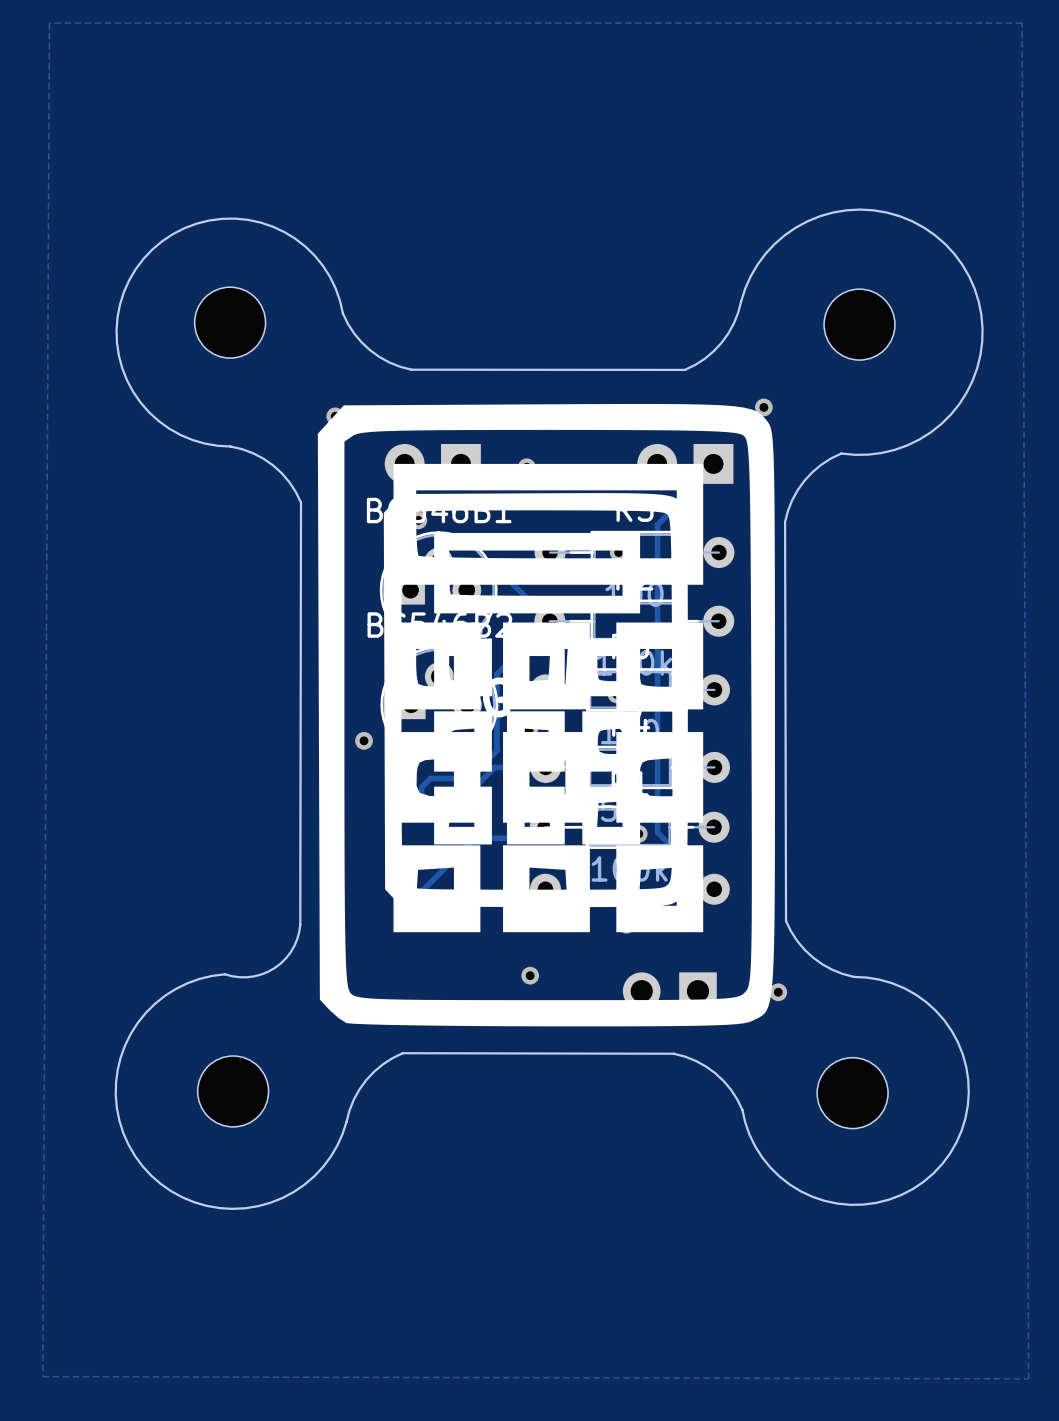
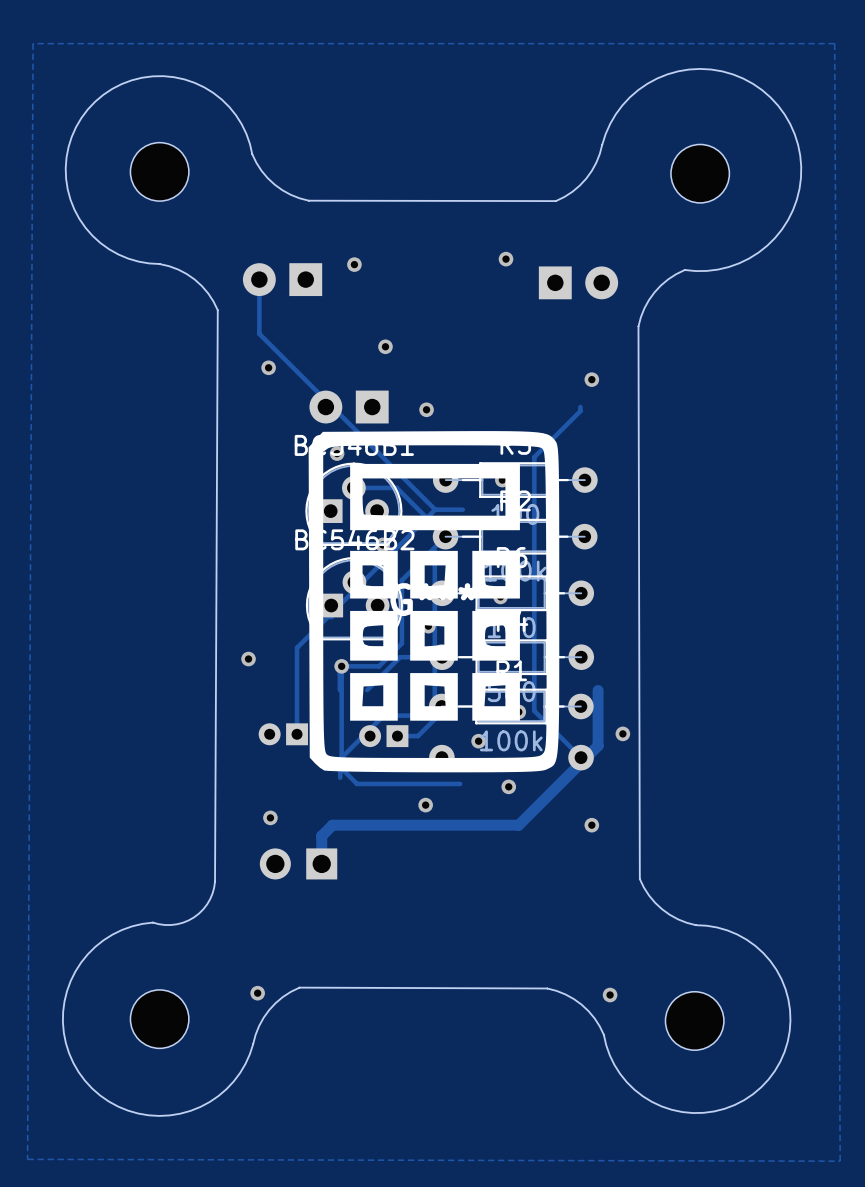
via: none -> (506, 259)
via: none -> (354, 264)
board edge: (741, 301) (733, 323) (721, 342) (704, 358) (684, 369) (411, 369) (389, 362) (361, 342) (347, 323) (335, 288) (323, 266) (305, 246) (272, 226) (235, 218) (196, 223) (162, 241) (135, 269) (119, 304) (117, 343) (122, 368) (140, 402) (158, 421) (180, 434) (204, 443) (241, 449) (263, 458) (281, 473) (301, 502) (299, 931) (294, 945) (286, 958) (268, 971) (246, 977) (224, 974) (212, 975) (187, 983) (165, 995) (145, 1012) (125, 1045) (116, 1082) (119, 1120) (134, 1155) (151, 1175) (171, 1191) (194, 1202) (232, 1208) (258, 1206) (293, 1191) (314, 1176) (330, 1156) (342, 1133) (353, 1099) (366, 1080) (382, 1064) (402, 1053) (673, 1053) (685, 1056) (715, 1073) (731, 1089) (742, 1109) (755, 1146) (779, 1176) (812, 1196) (837, 1203) (876, 1202) (901, 1195) (923, 1182) (949, 1153) (965, 1118) (968, 1079) (957, 1042) (944, 1020) (926, 1002) (904, 988) (879, 979) (842, 974) (822, 964) (797, 940) (786, 921) (785, 522) (797, 490) (821, 464) (841, 453) (881, 453) (907, 445) (930, 432) (950, 414) (972, 380) (980, 354) (982, 328) (978, 301) (962, 264) (935, 235) (899, 216) (859, 209) (820, 216) (784, 235) (757, 264) (741, 301) -> (602, 144) (596, 162) (586, 178) (572, 191) (555, 201) (308, 200) (290, 194) (267, 178) (252, 154) (241, 124) (229, 106) (213, 92) (184, 79) (152, 76) (121, 84) (95, 101) (76, 127) (68, 147) (66, 178) (74, 209) (85, 227) (100, 243) (118, 254) (138, 261) (169, 266) (186, 274) (201, 286) (217, 310) (215, 881) (212, 893) (207, 904) (194, 917) (183, 922) (171, 925) (152, 922) (142, 923) (112, 934) (87, 954) (70, 980) (63, 1011) (63, 1032) (69, 1053) (84, 1080) (100, 1095) (118, 1106) (138, 1113) (169, 1115) (190, 1110) (209, 1102) (226, 1089) (240, 1072) (249, 1054) (259, 1026) (269, 1010) (282, 996) (299, 987) (547, 988) (556, 990) (581, 1004) (594, 1018) (603, 1034) (614, 1064) (634, 1089) (652, 1101) (682, 1112) (714, 1111) (734, 1105) (761, 1087) (780, 1061) (789, 1031) (790, 1009) (785, 989) (770, 961) (755, 945) (737, 934) (717, 927) (686, 922) (669, 914) (649, 895) (639, 879) (638, 326) (648, 300) (668, 279) (684, 270) (717, 269) (739, 263) (758, 252) (775, 237) (788, 219) (796, 199) (801, 177) (800, 155) (790, 124) (770, 97) (743, 78) (711, 69) (678, 71) (647, 83) (622, 105) (610, 123) (602, 144)
track: none -> (259, 279) (259, 333) (435, 509)
part: none -> (282, 279)
part position: (230, 322) -> (159, 171)
part position: (859, 324) -> (700, 173)
via: none -> (385, 346)
drawing: [317, 403, 775, 1027] -> none
via position: (763, 407) -> (591, 379)
part rotation: 0° (685, 463) -> 180° (578, 282)
part position: (685, 463) -> (578, 282)
track: none -> (435, 509) (331, 613) (331, 616) (327, 616) (297, 647) (297, 734)
track: none -> (462, 509) (435, 509)
track: none -> (434, 551) (434, 719) (417, 736) (397, 736)
via: (364, 740) -> none
via: none -> (248, 659)
track: none -> (341, 666) (341, 768) (357, 783) (460, 783)
via: none -> (341, 666)
track: none -> (598, 690) (598, 745) (518, 825) (332, 825) (321, 836) (321, 863)
part: none -> (283, 734)
via: none -> (622, 733)
part: none -> (383, 736)
via: none -> (478, 741)
via: none -> (270, 817)
via position: (530, 975) -> (425, 805)
part position: (669, 991) -> (298, 863)
via position: (778, 992) -> (591, 825)
part position: (233, 1091) -> (159, 1019)
part position: (852, 1093) -> (694, 1020)
via: none -> (257, 993)
via: none -> (610, 995)

